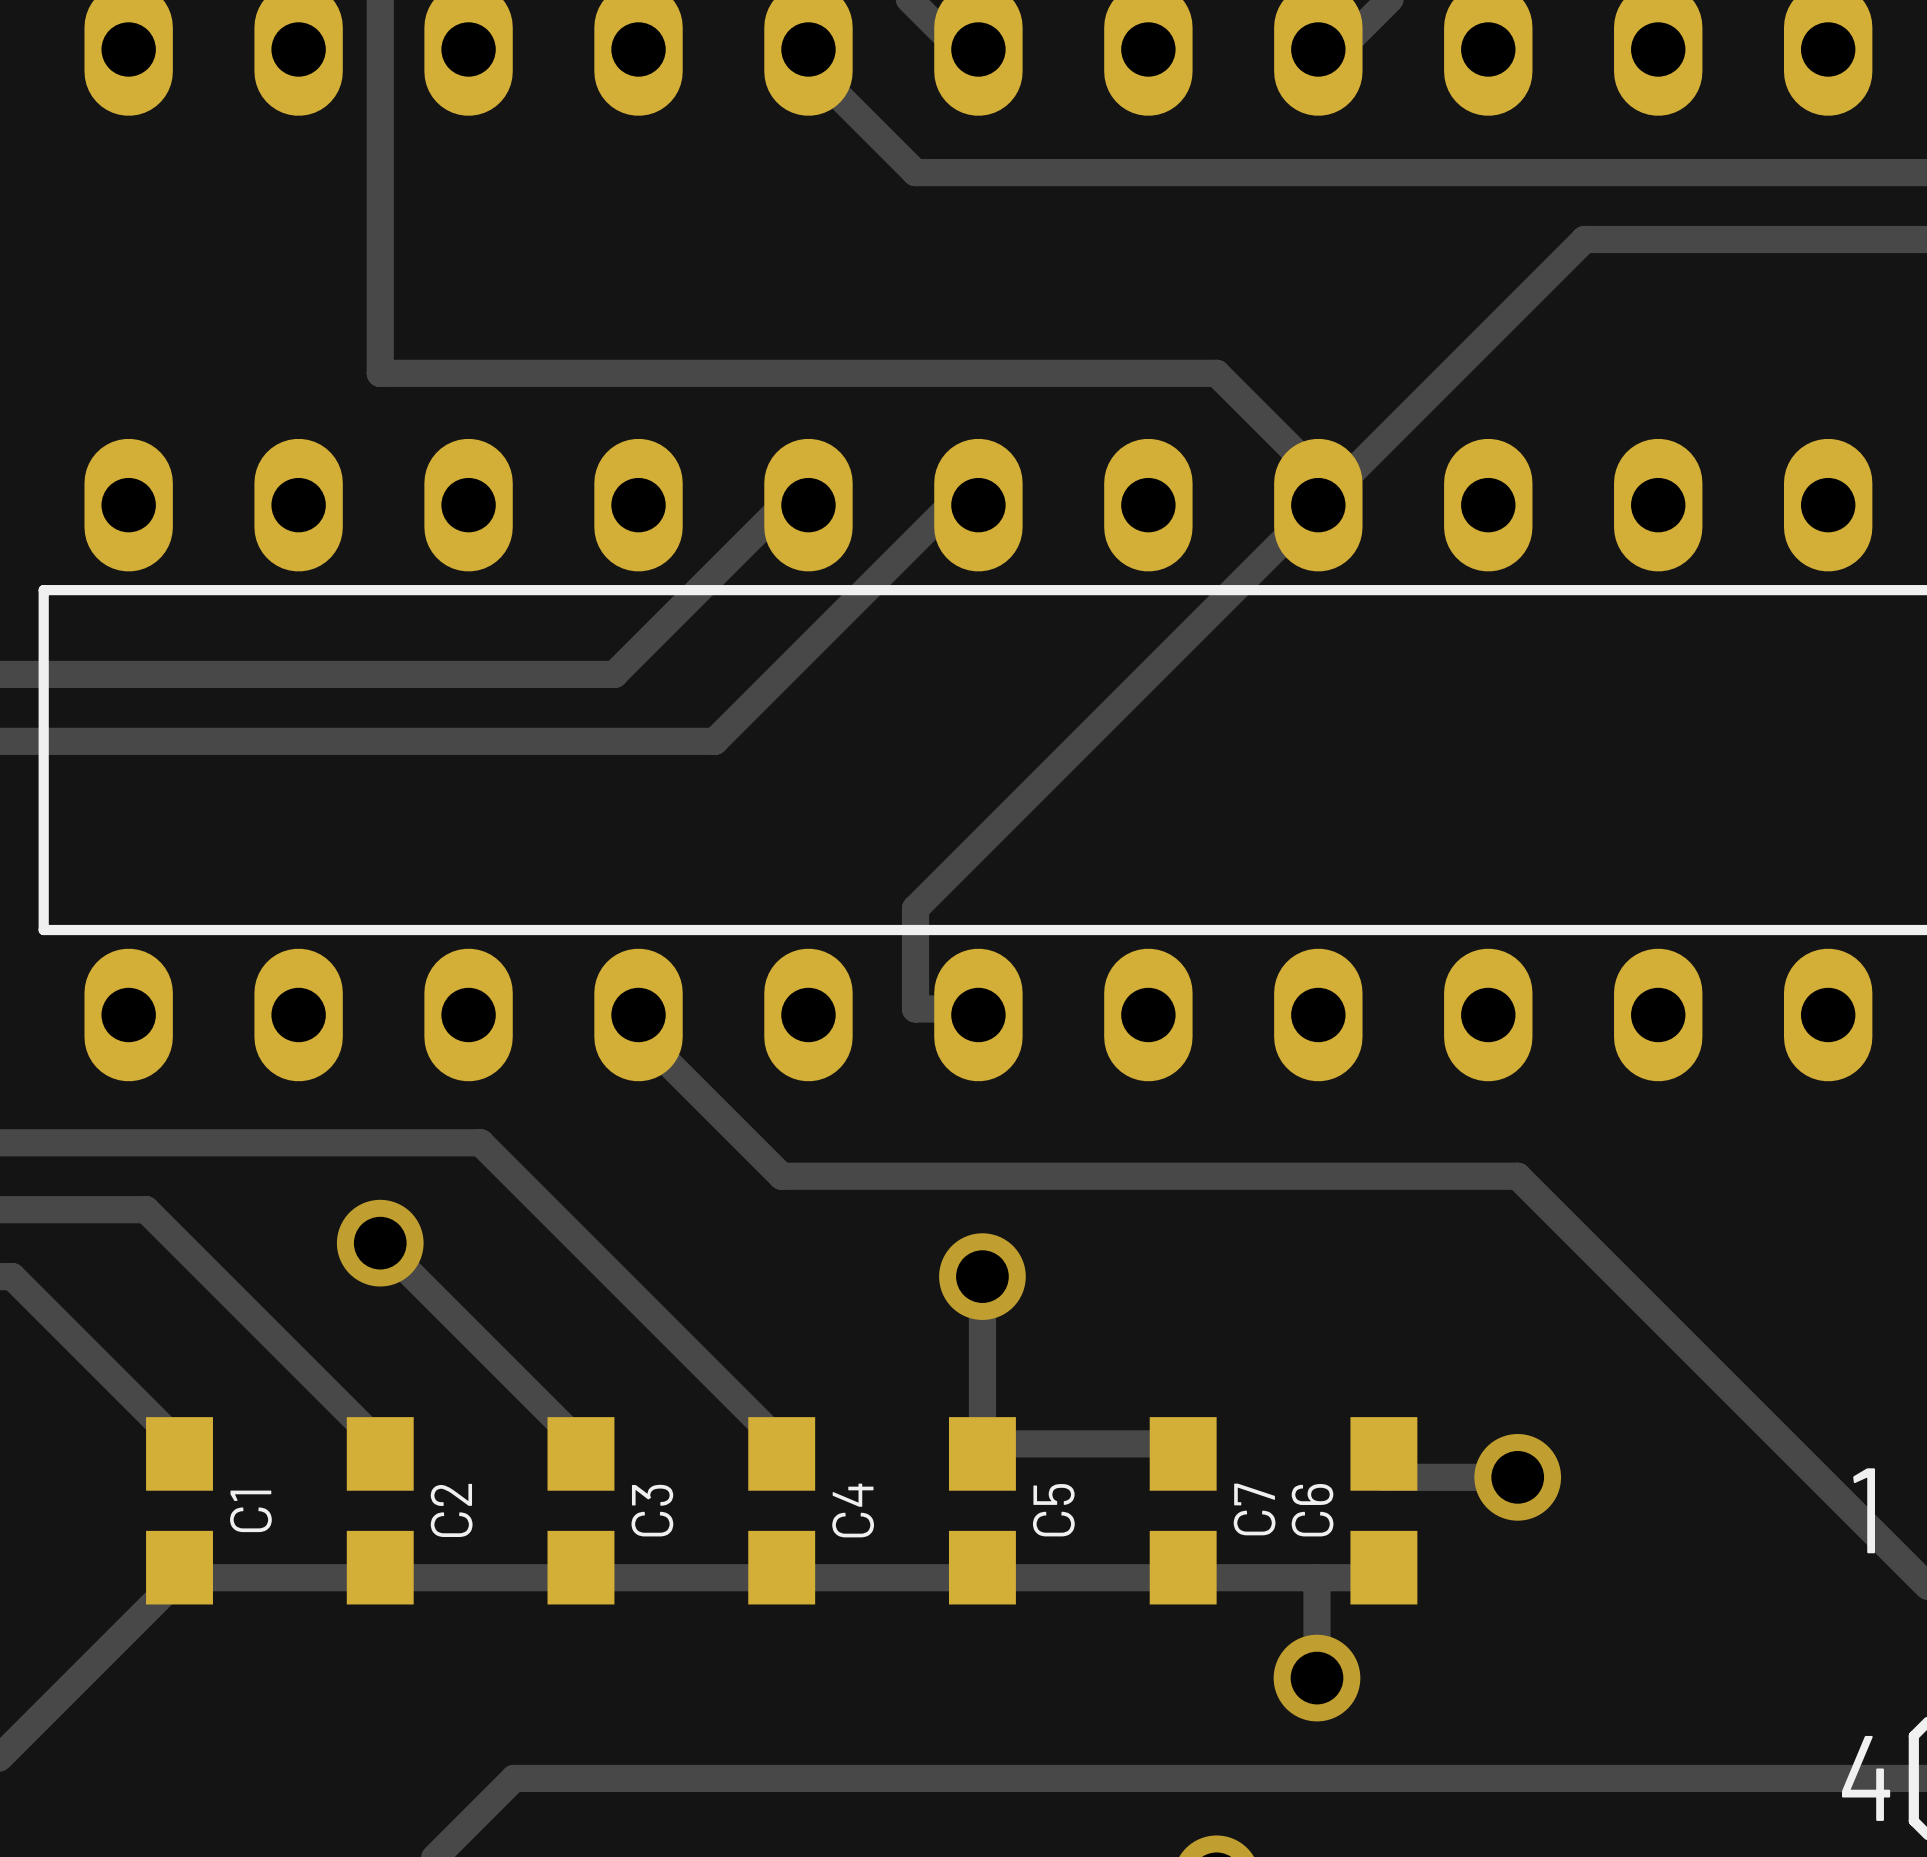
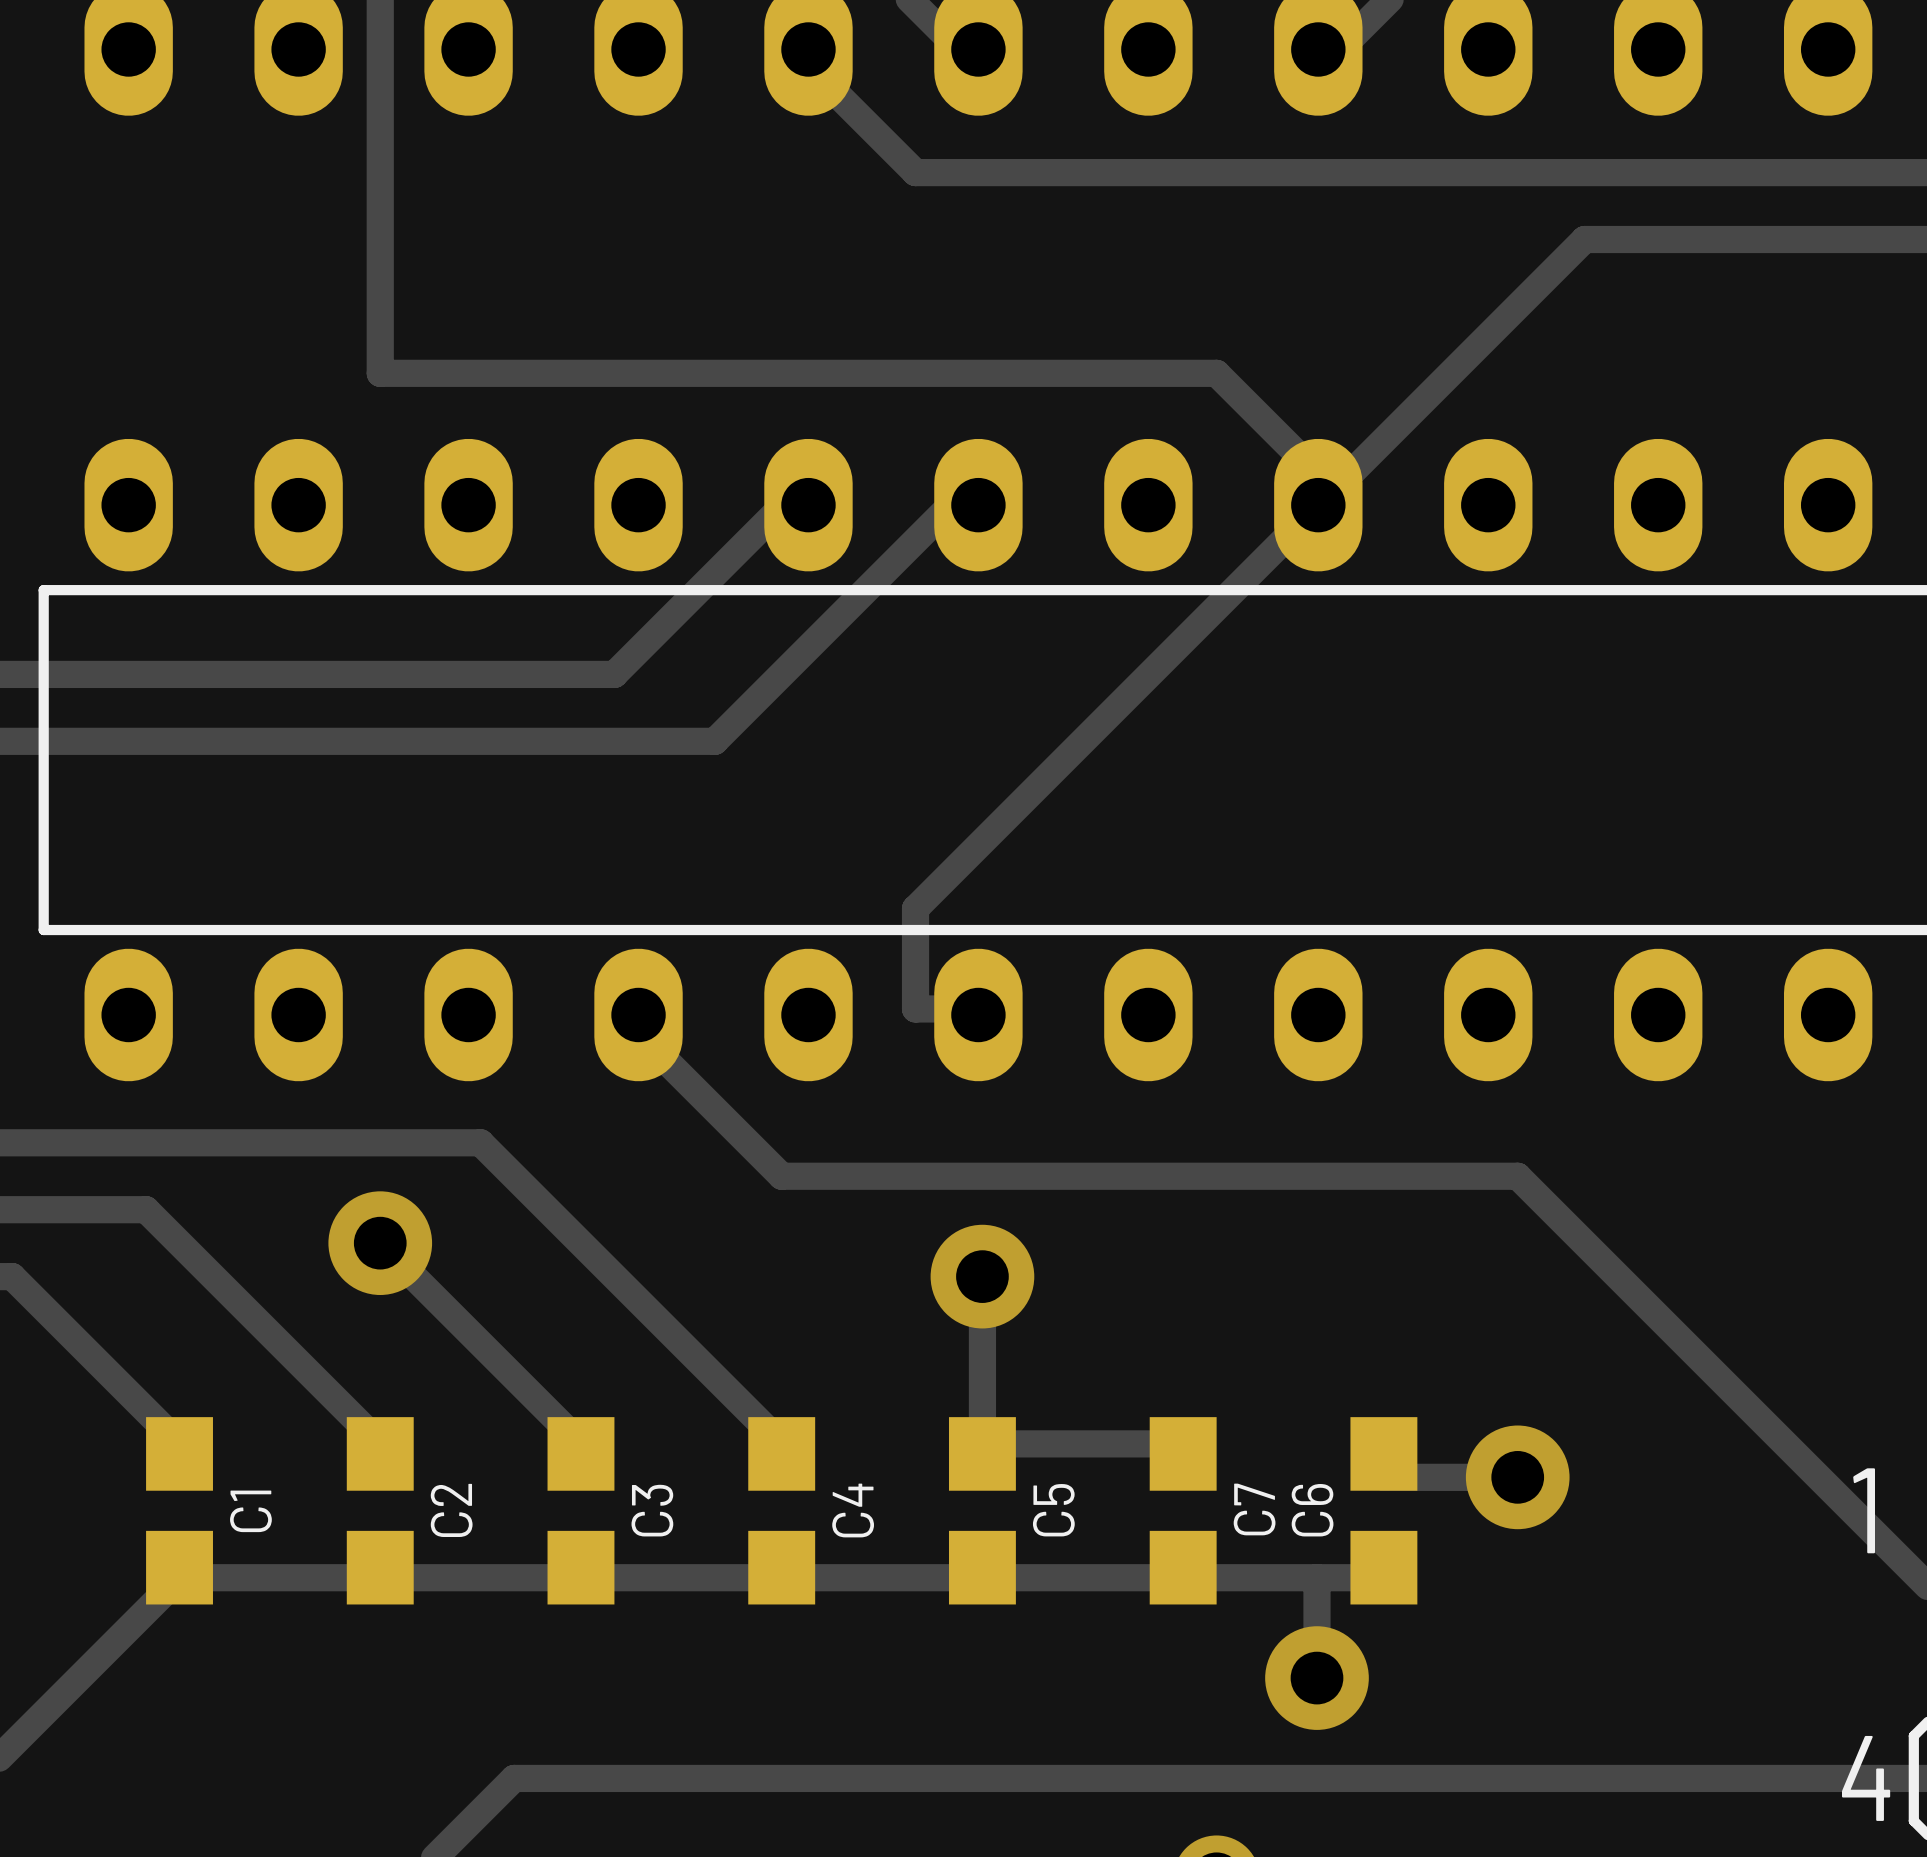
via size: [336, 1199, 424, 1287] -> [328, 1191, 433, 1295]
via size: [939, 1233, 1026, 1320] -> [930, 1224, 1035, 1329]
via size: [1474, 1434, 1562, 1521] -> [1465, 1425, 1570, 1530]
via size: [1273, 1634, 1361, 1722] -> [1265, 1626, 1369, 1730]

